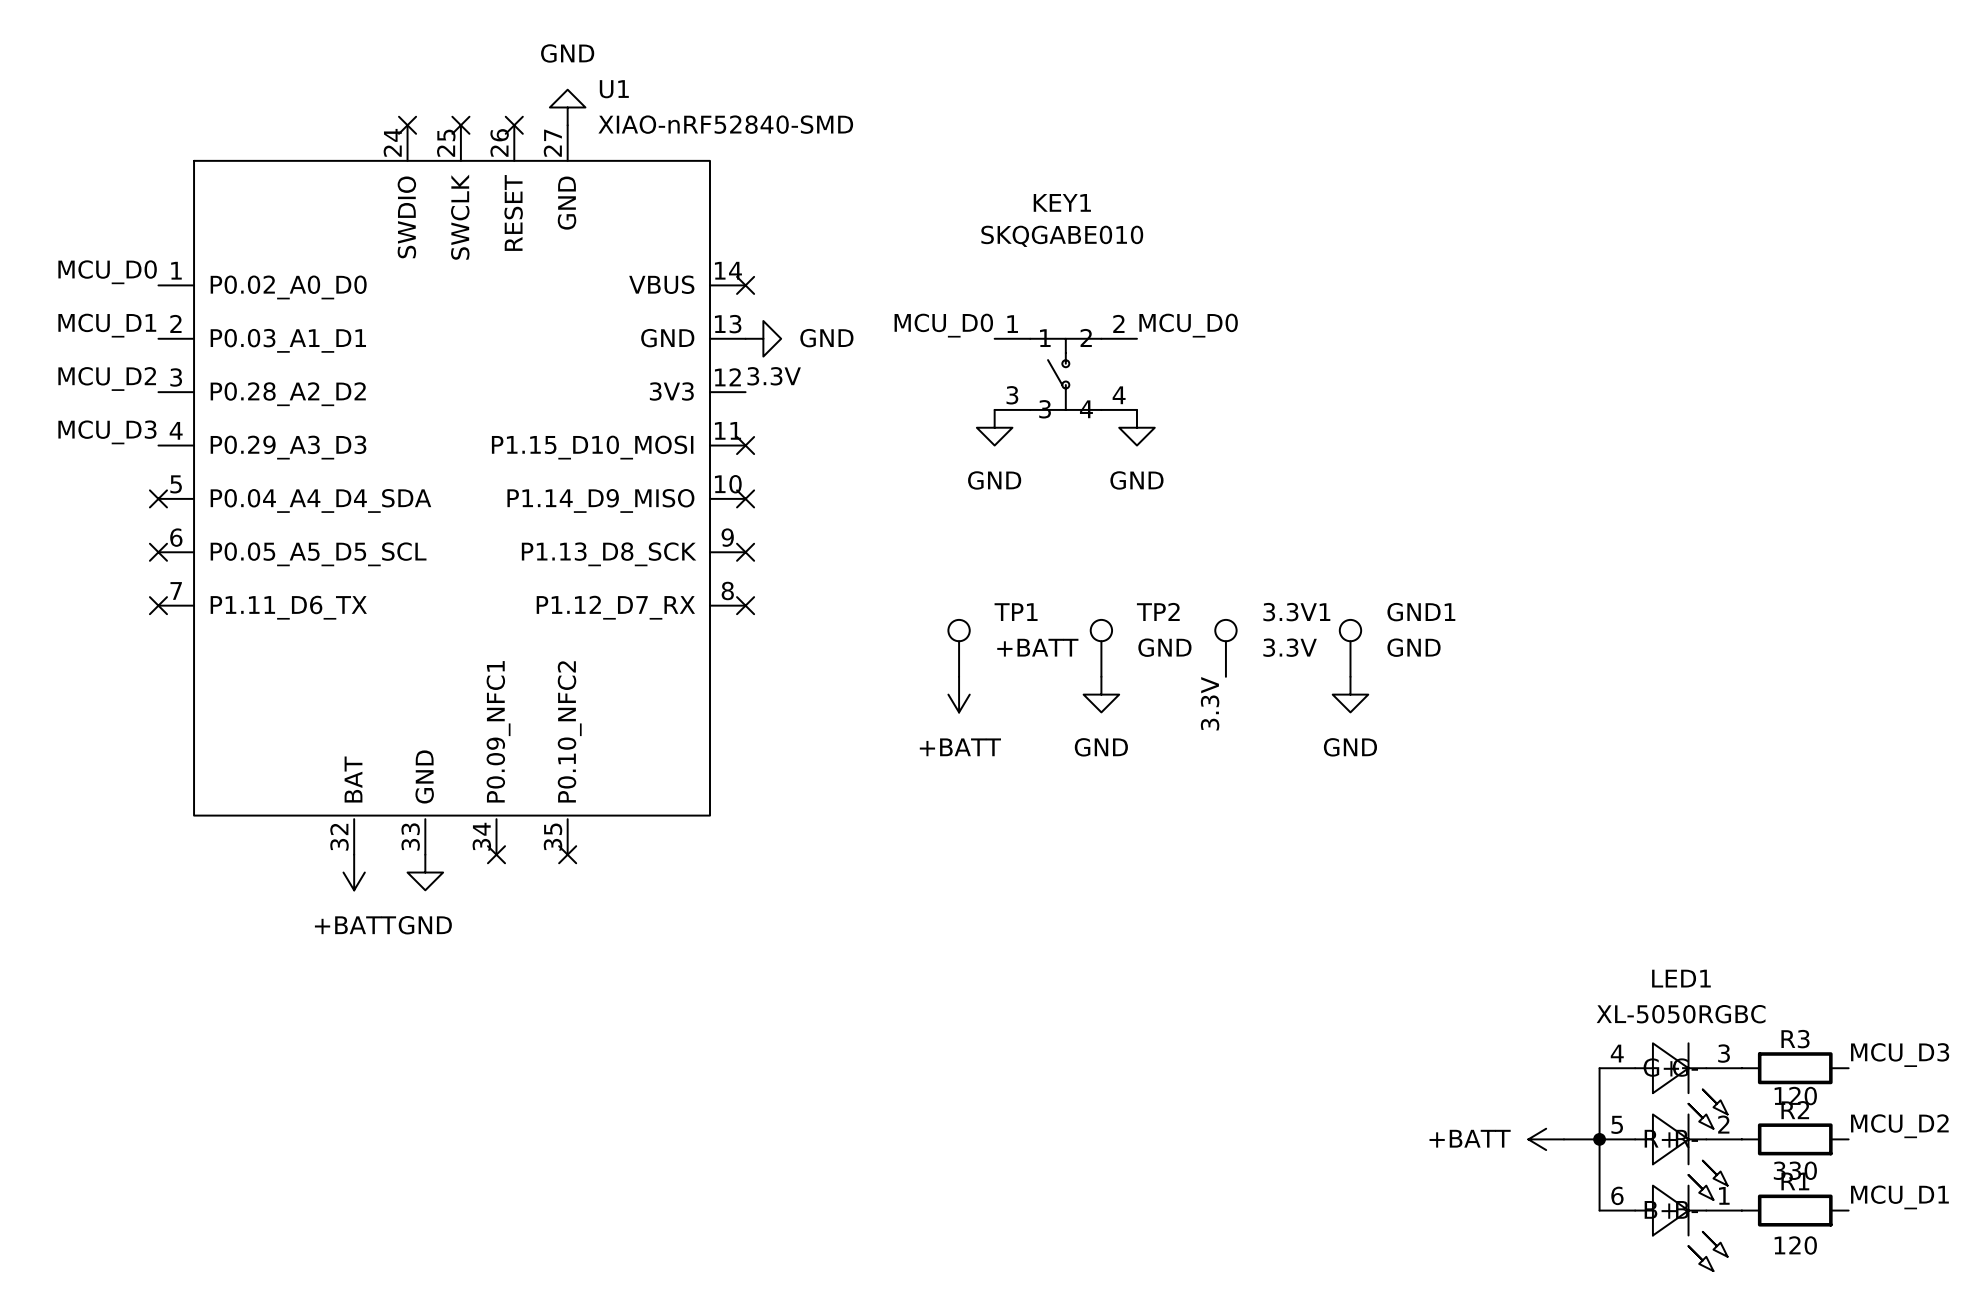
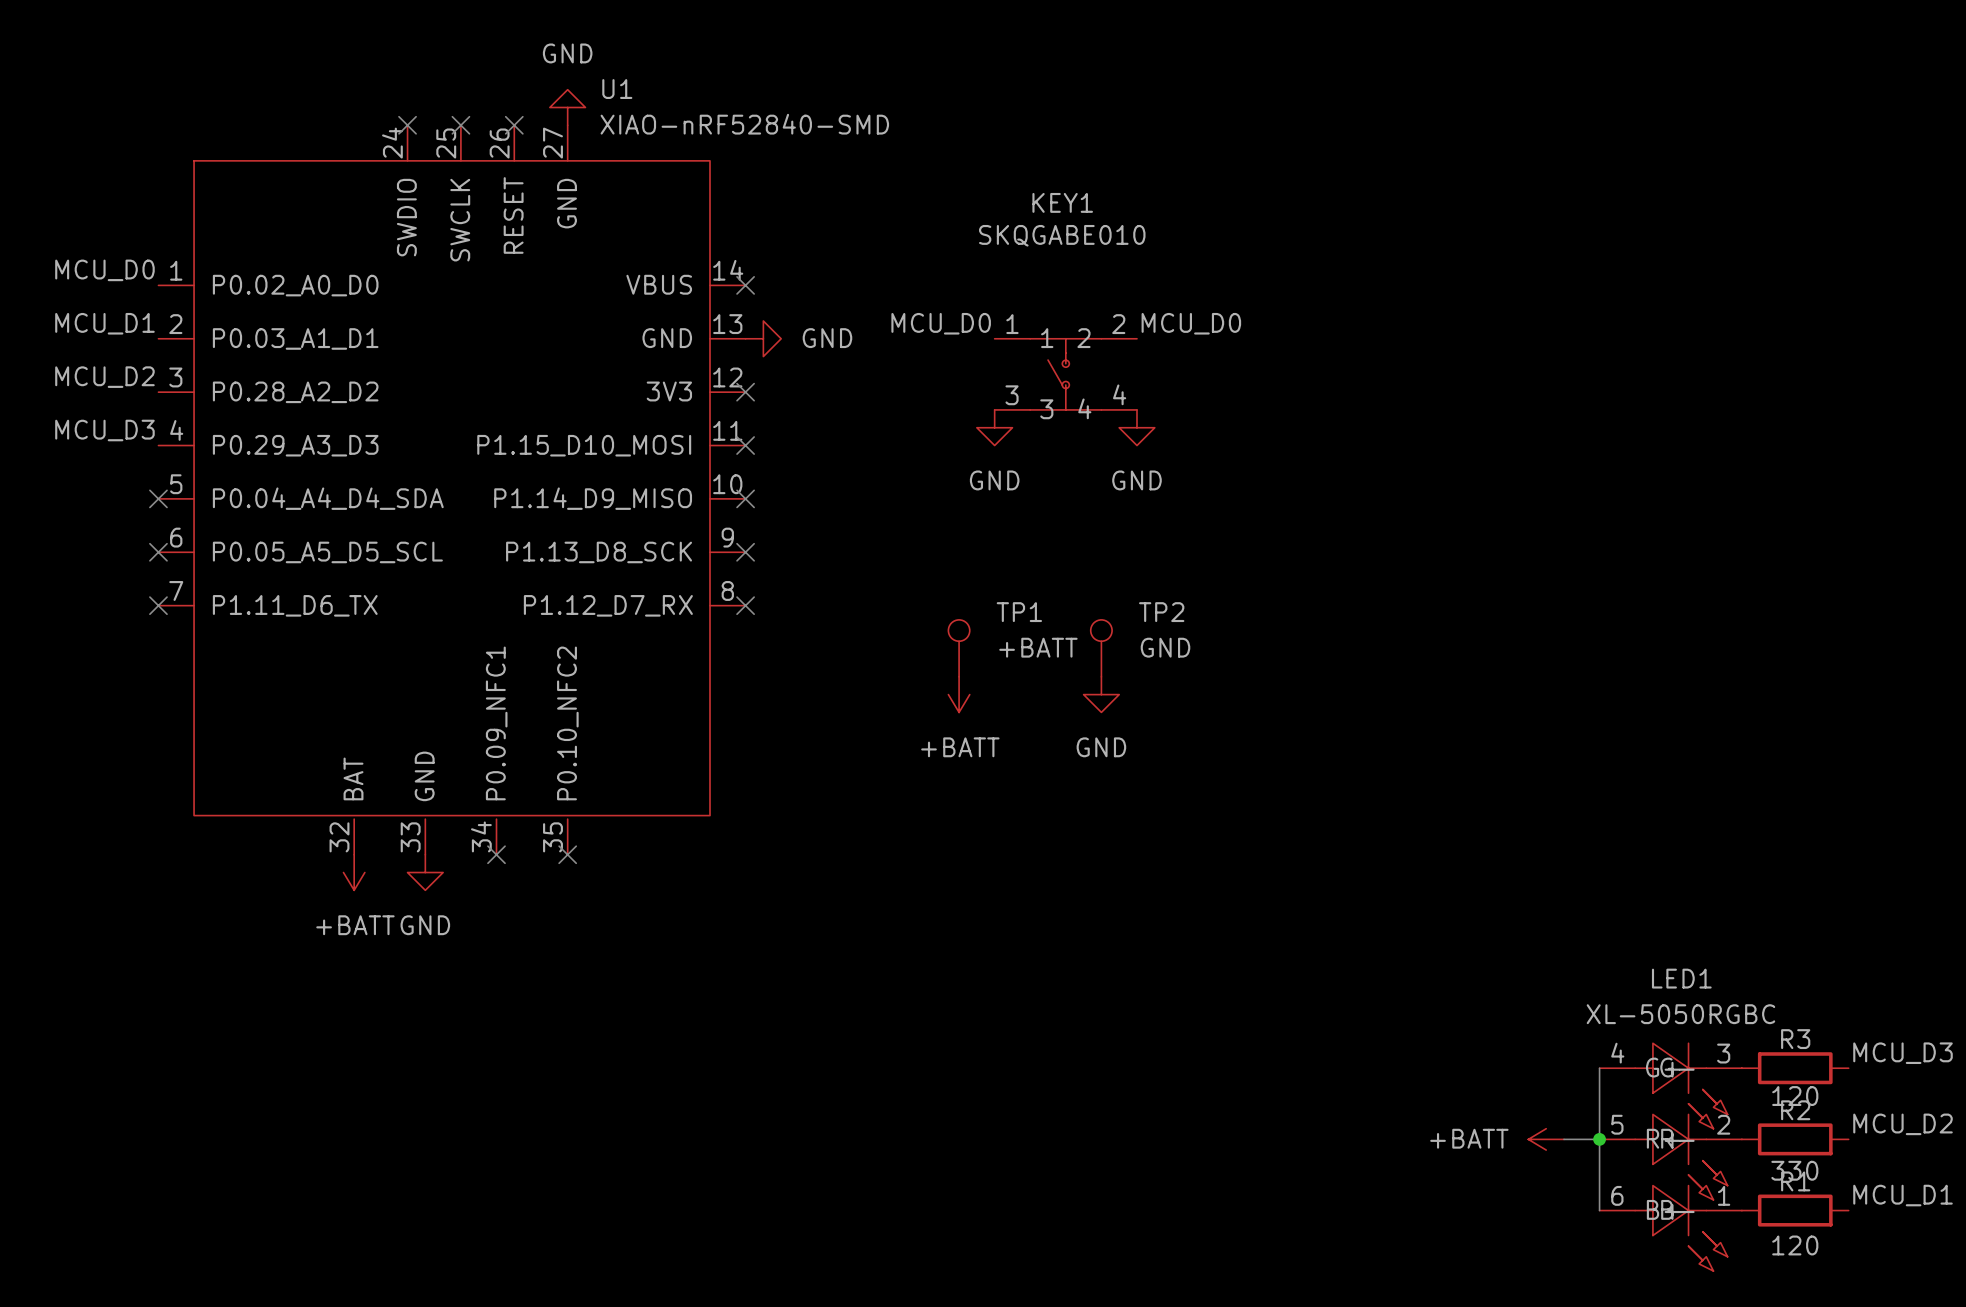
label: 3.3V (774, 376) -> none
no-connect mark: none -> (745, 392)
3.3V1: 3.3V (1225, 648) -> none
GND1: GND (1350, 648) -> none
power symbol: GND (1350, 694) -> none
label: 3.3V (1210, 703) -> none

